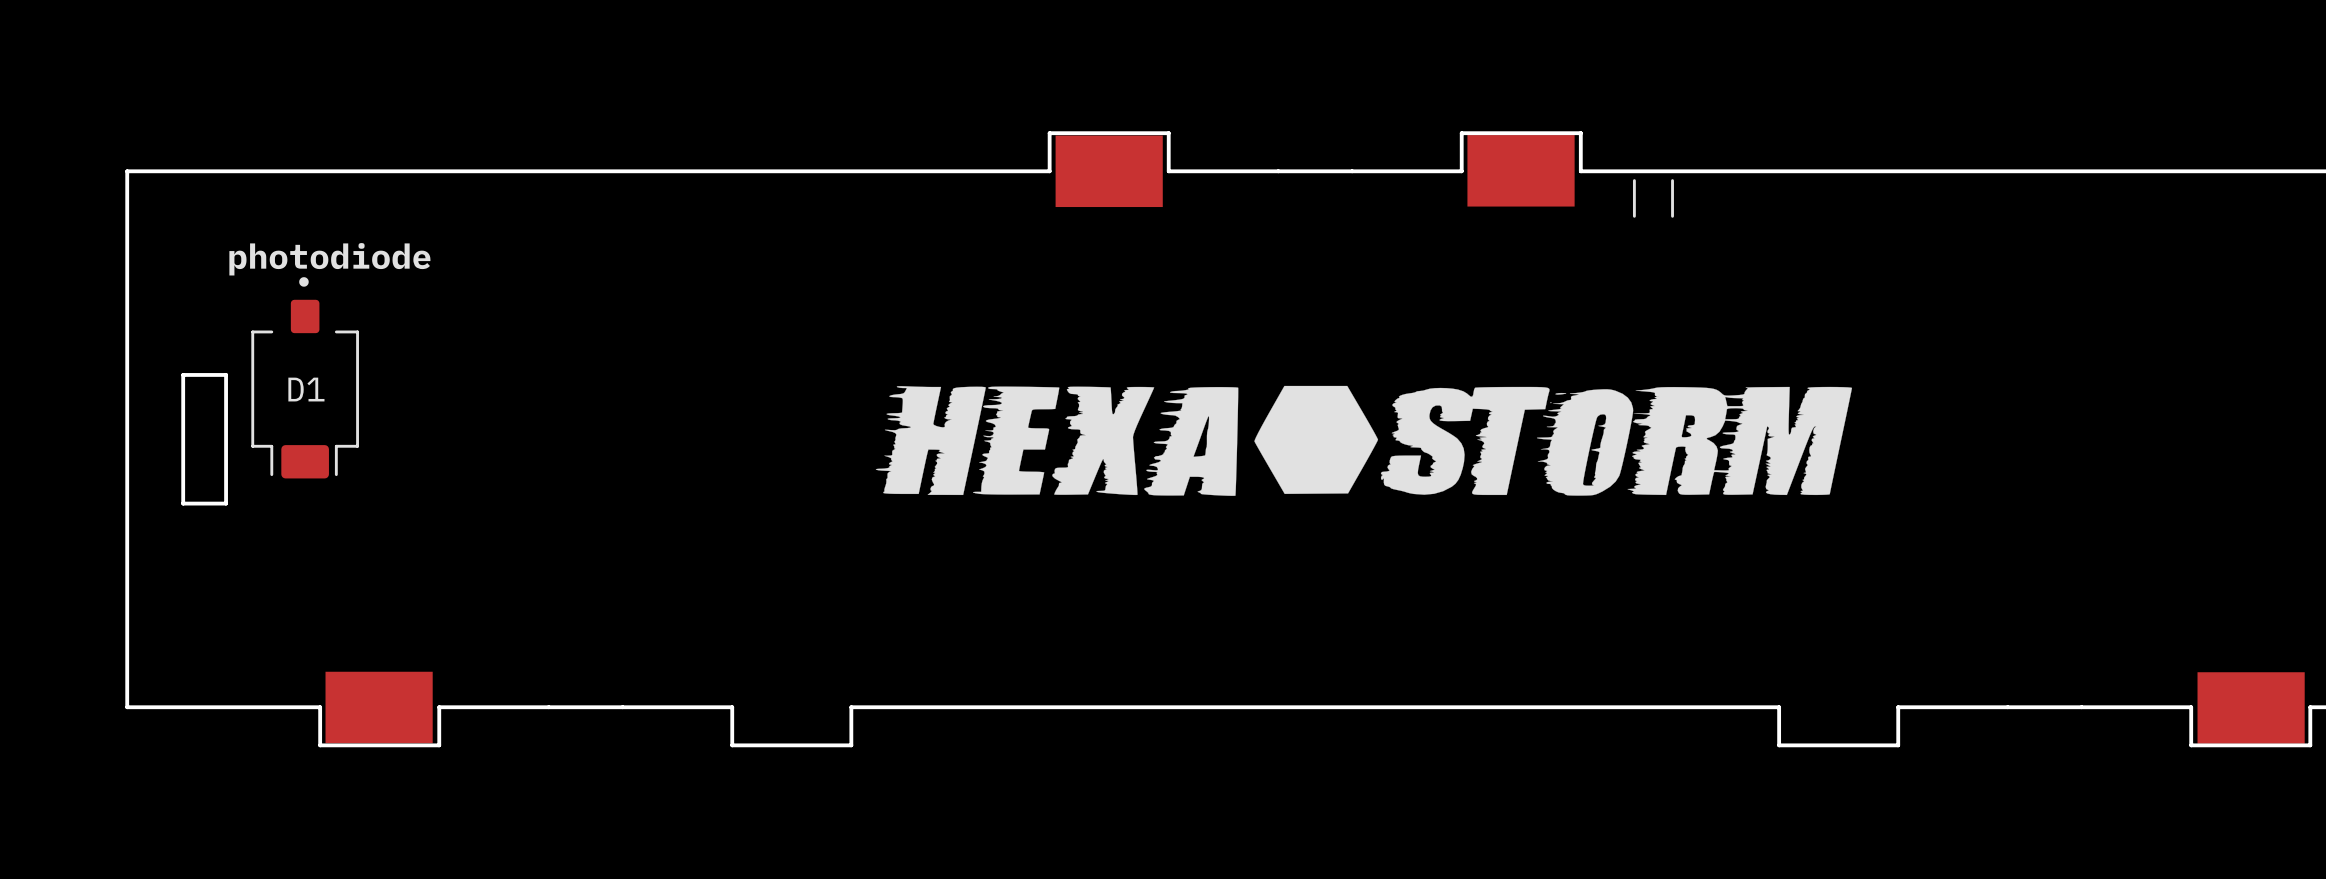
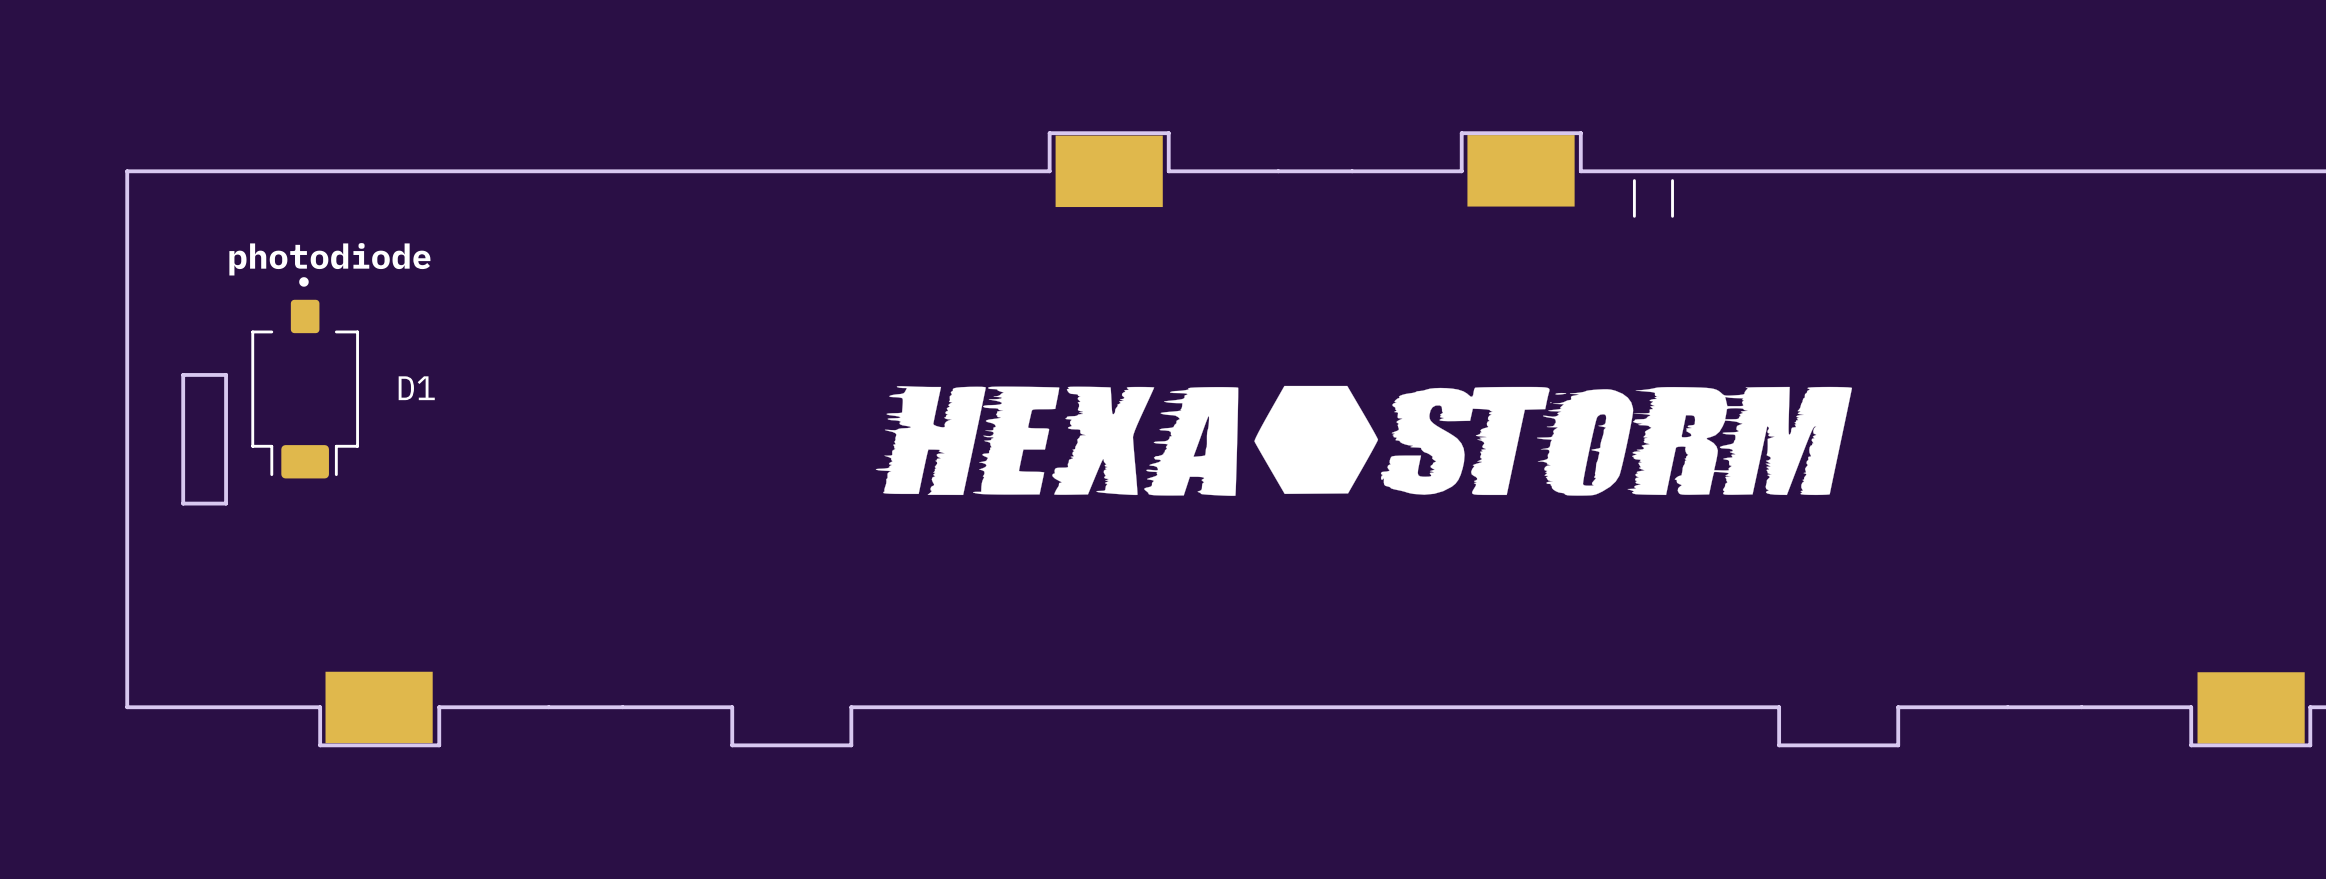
D1 name position: D1 (306, 389) -> D1 (416, 388)

